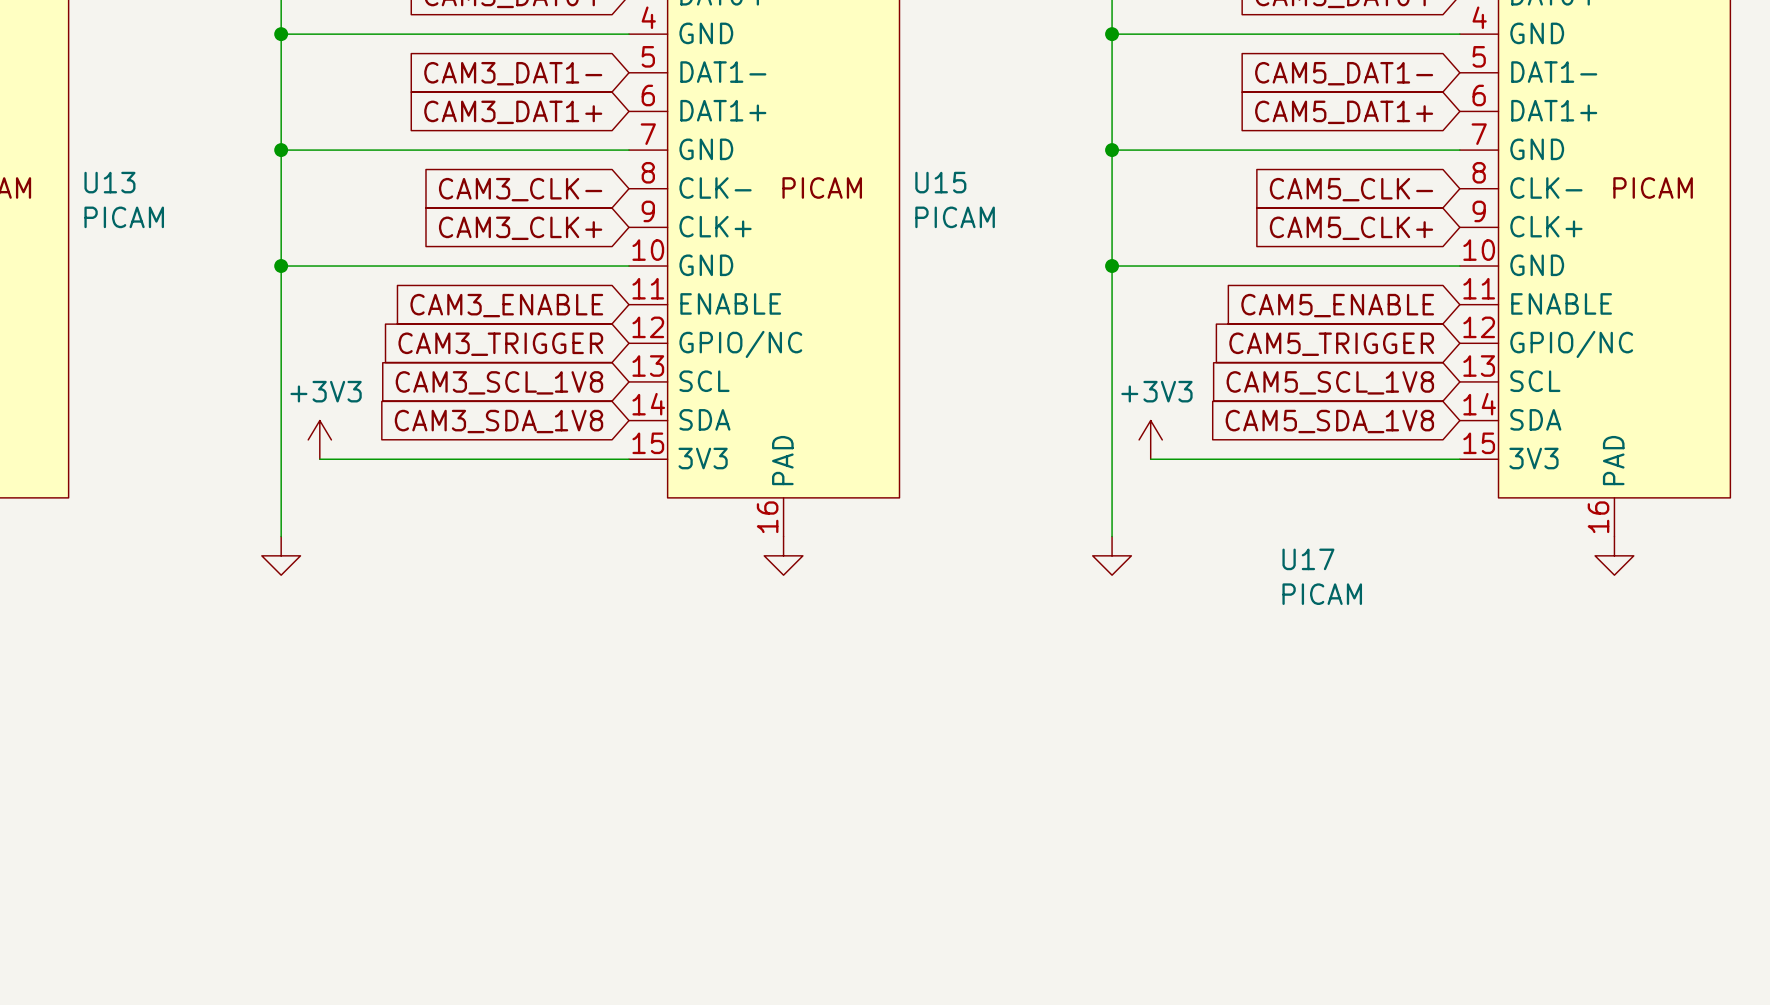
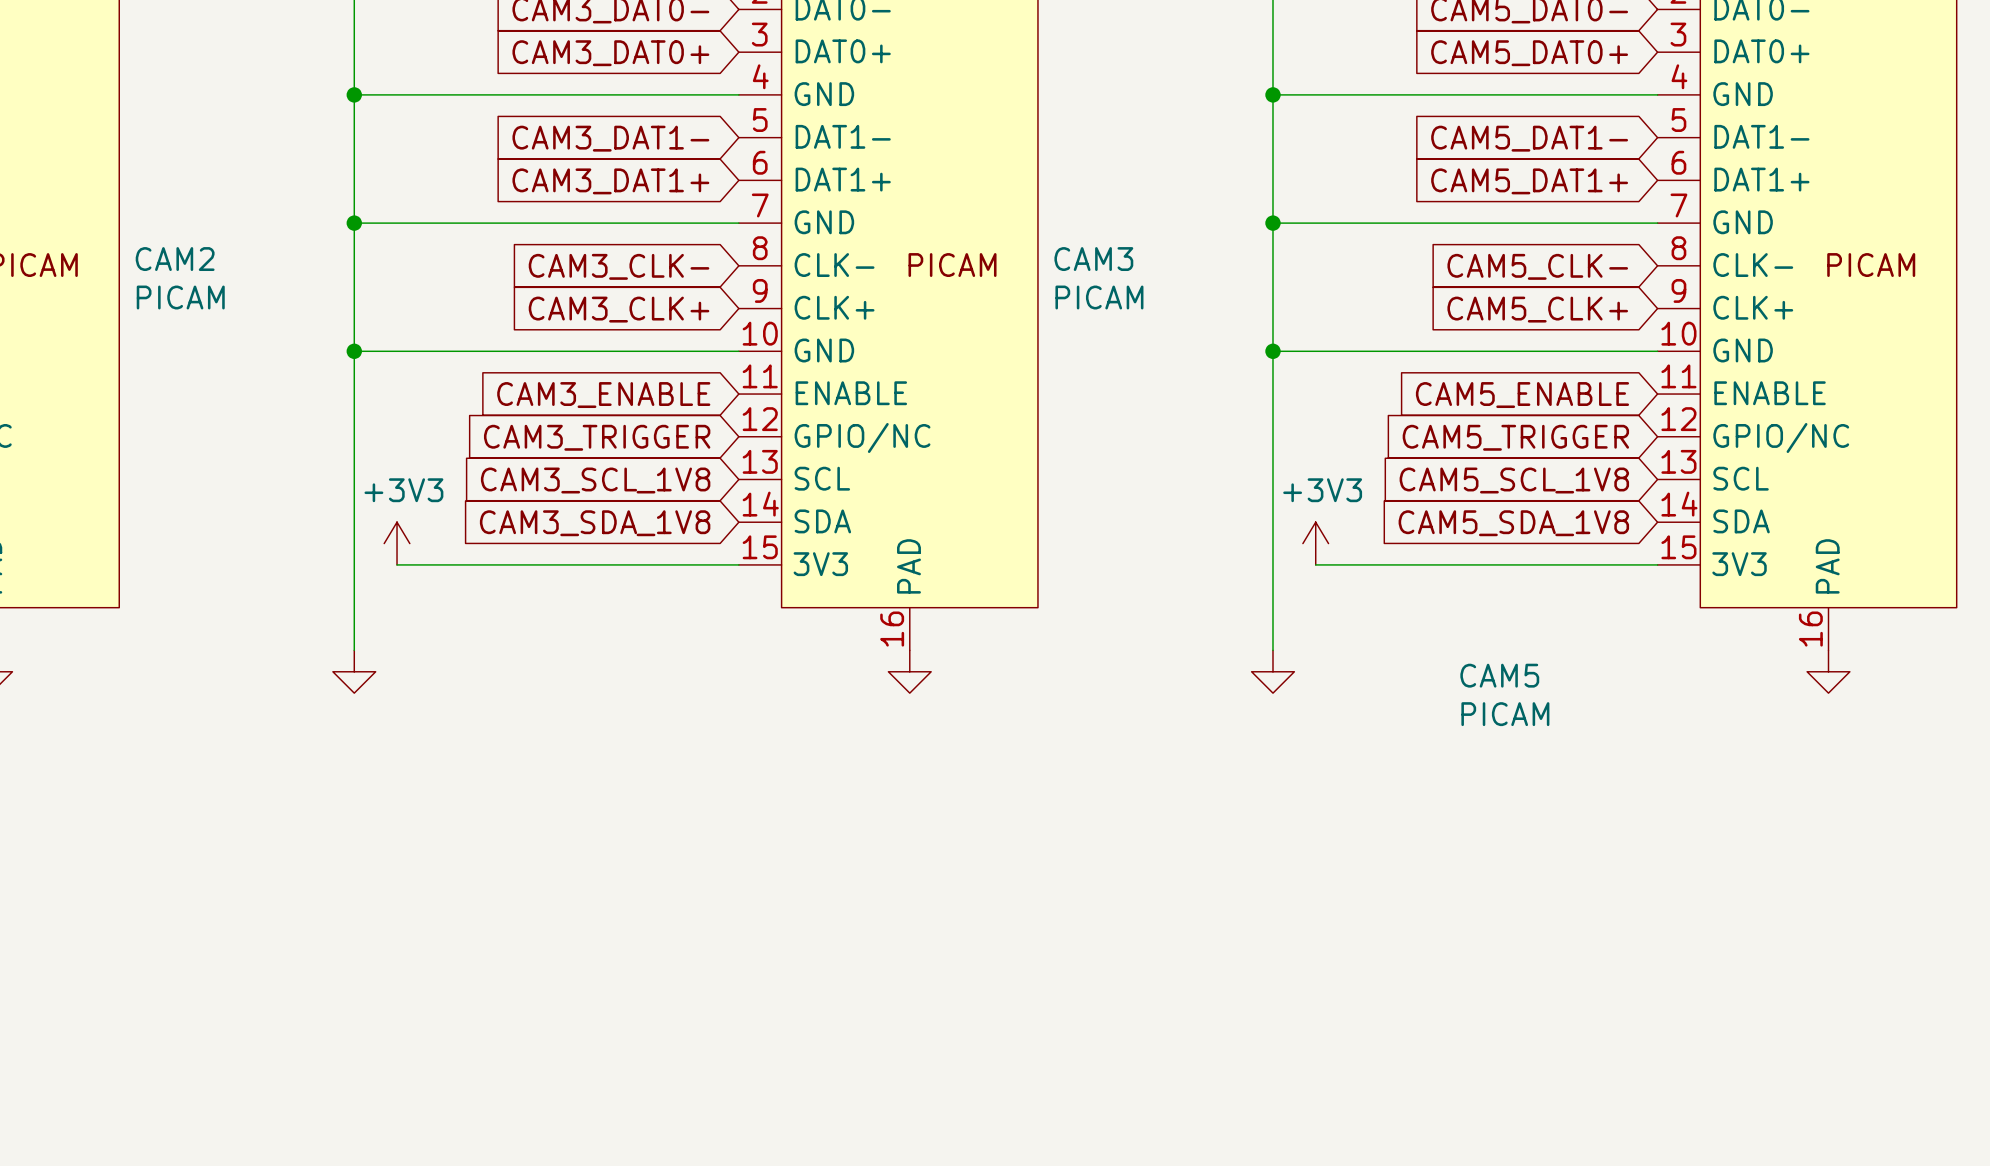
U13 name: U13 (109, 182) -> CAM2 (175, 259)
U15 name: U15 (940, 182) -> CAM3 (1093, 259)
U17 name: U17 (1308, 559) -> CAM5 (1499, 675)

